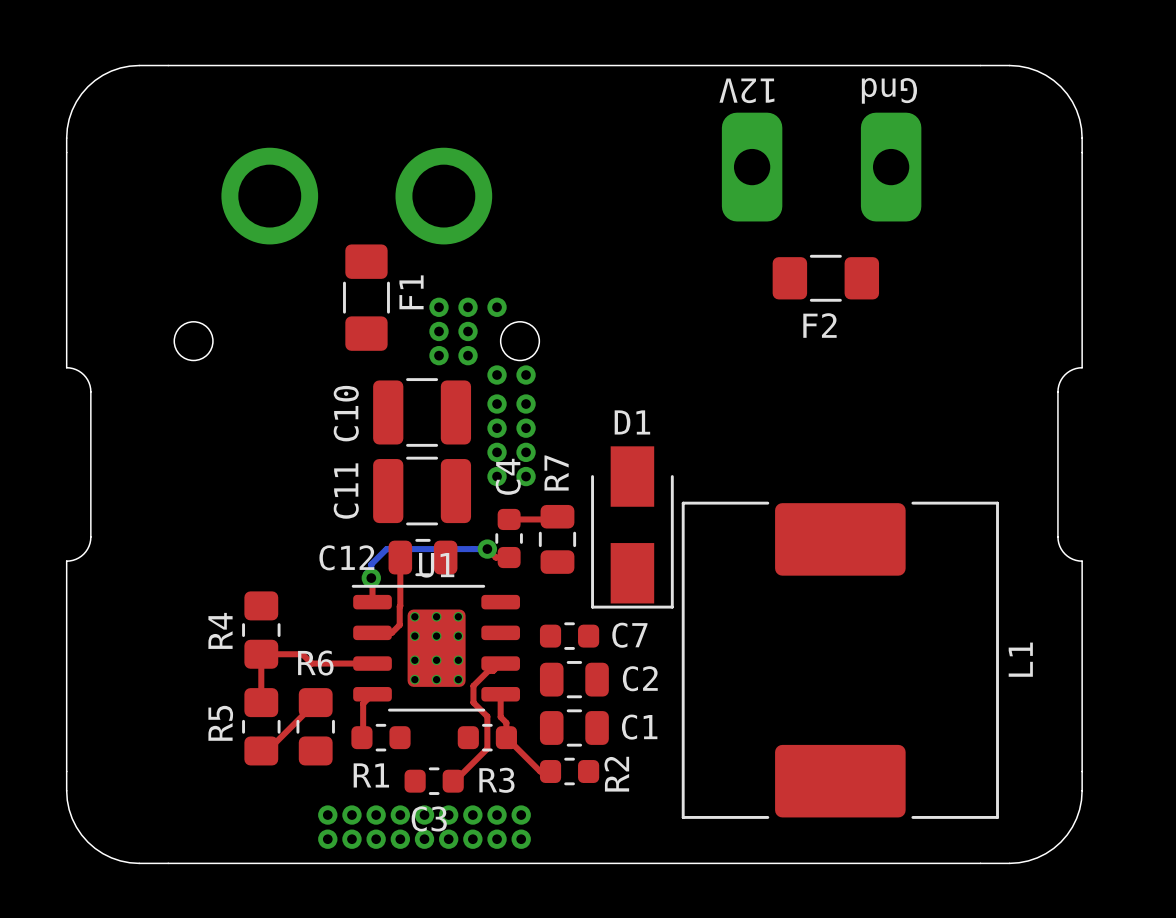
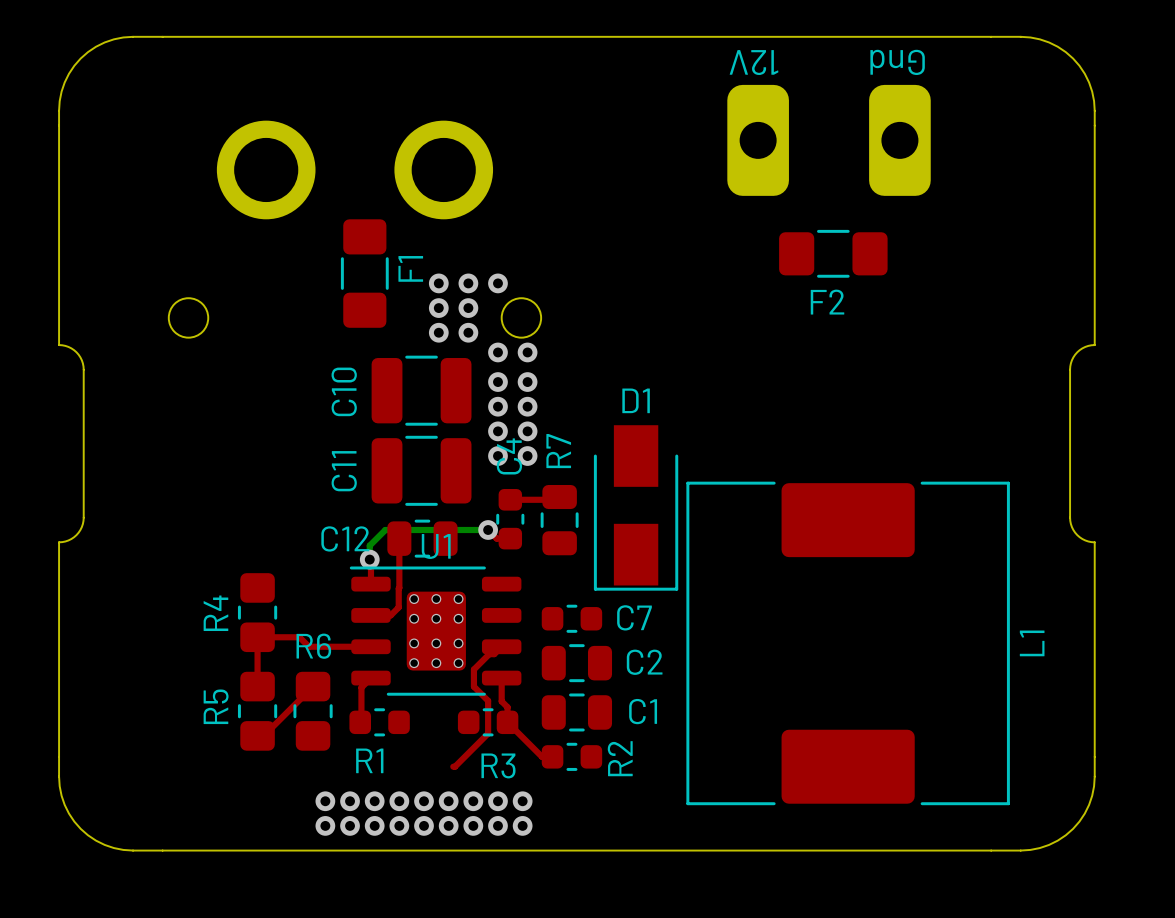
C3: (434, 781) -> none

